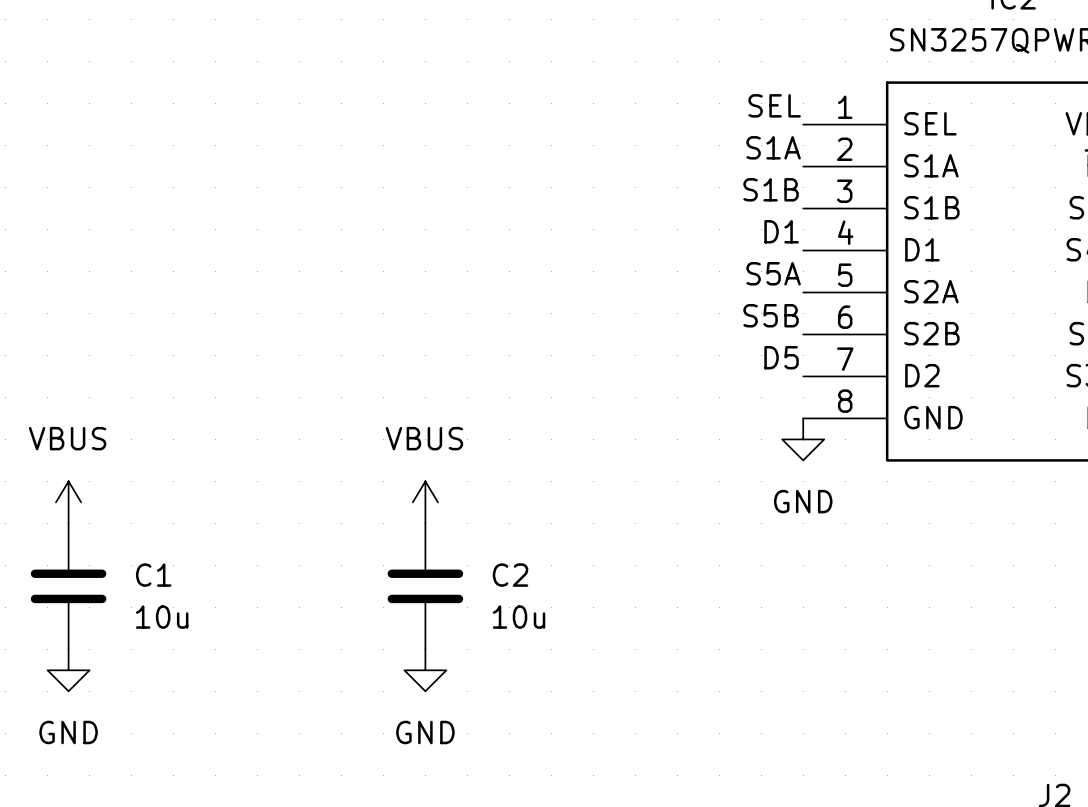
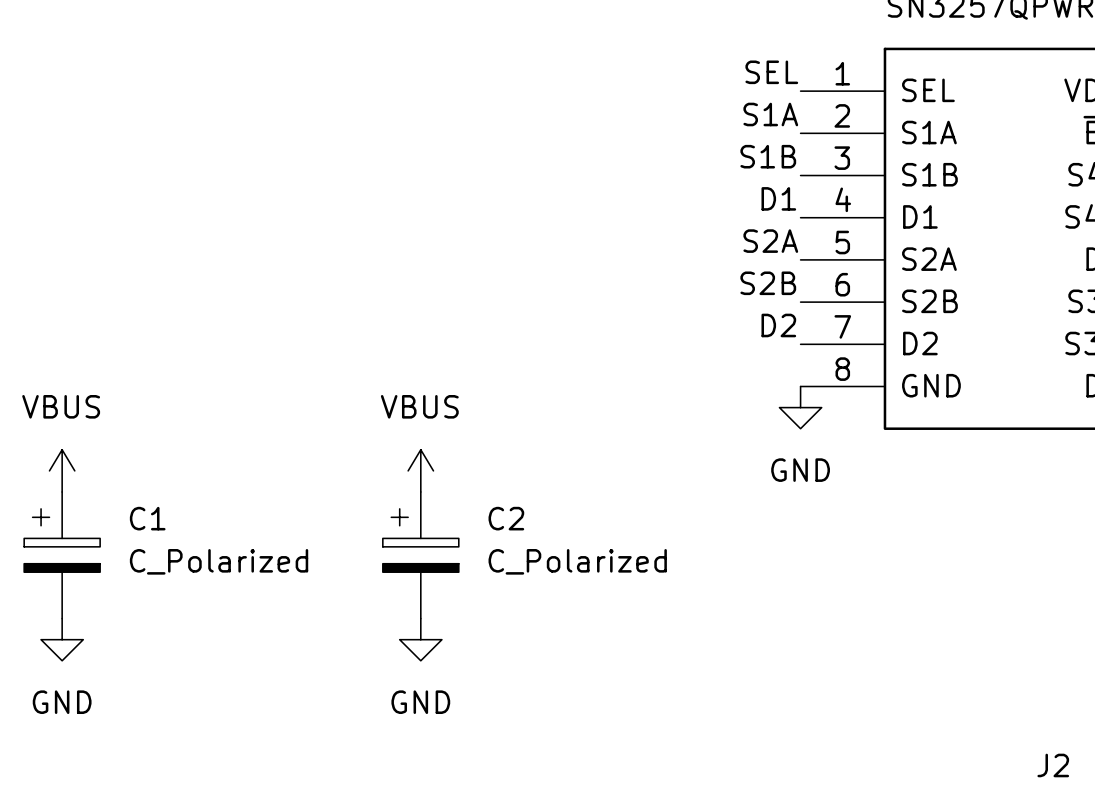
label: S5A (773, 273) -> S2A (770, 241)
label: S5B (771, 315) -> S2B (768, 283)
label: D5 (781, 357) -> D2 (778, 325)
C1 symbol: [30, 523, 107, 650] -> [24, 491, 101, 619]
C2 symbol: [387, 523, 464, 650] -> [382, 491, 459, 619]
C1 value: 10u (162, 617) -> C_Polarized (219, 561)
C2 value: 10u (519, 617) -> C_Polarized (577, 561)

